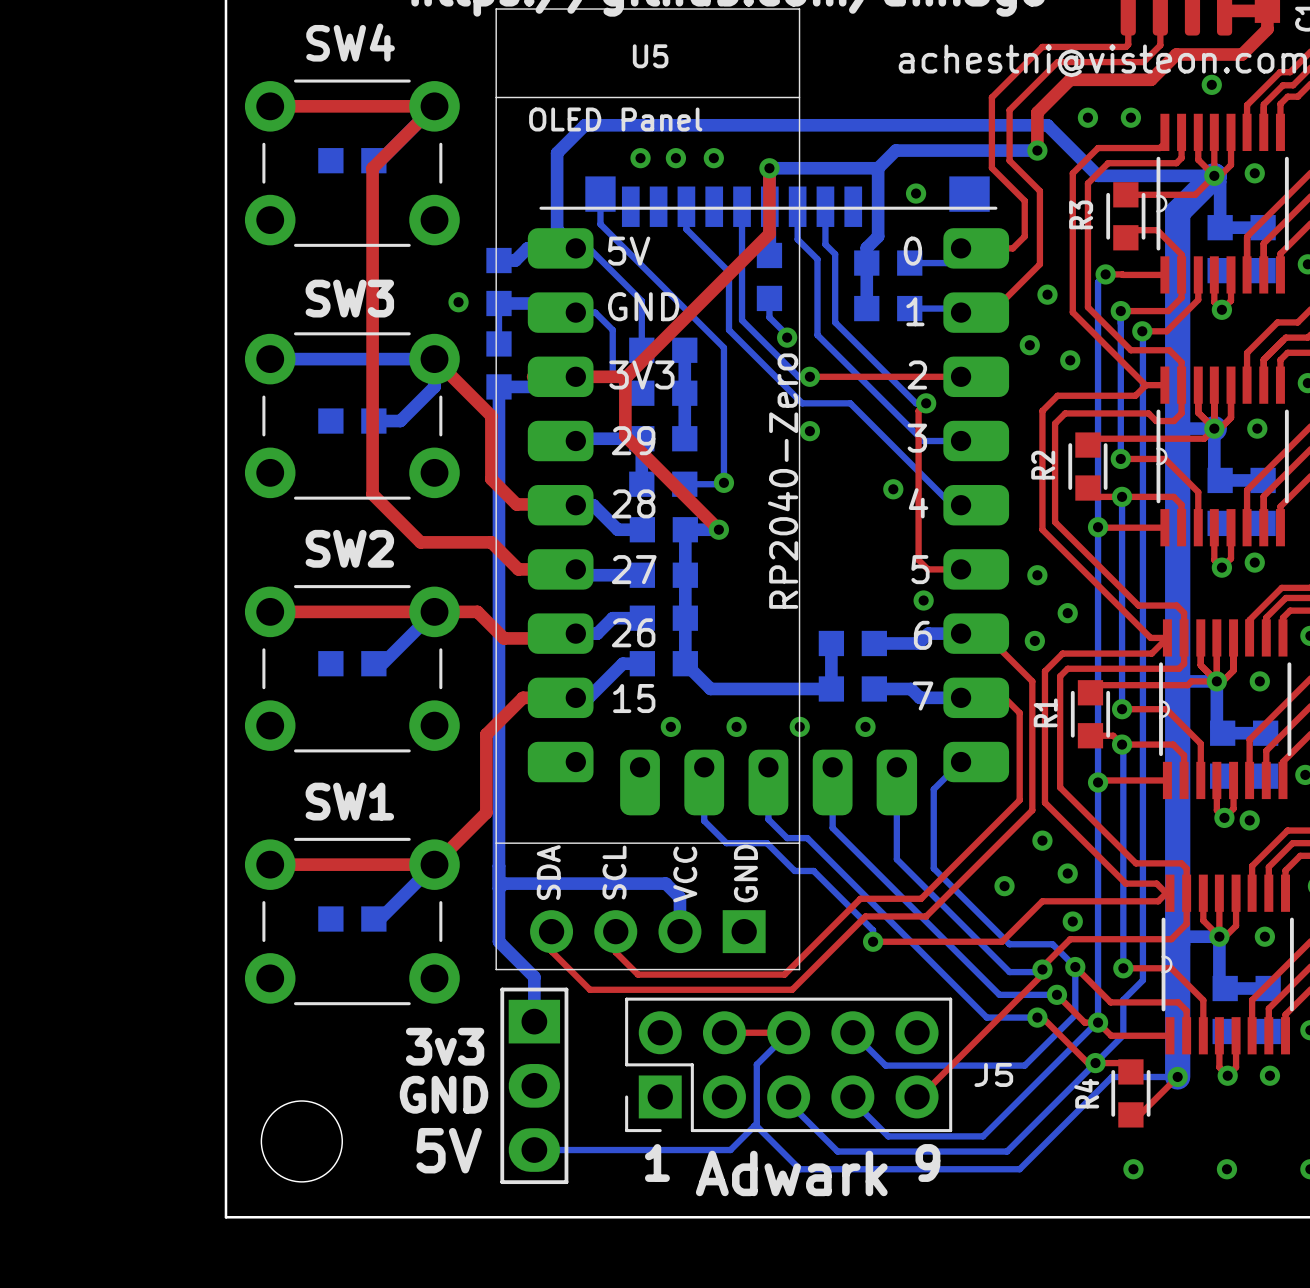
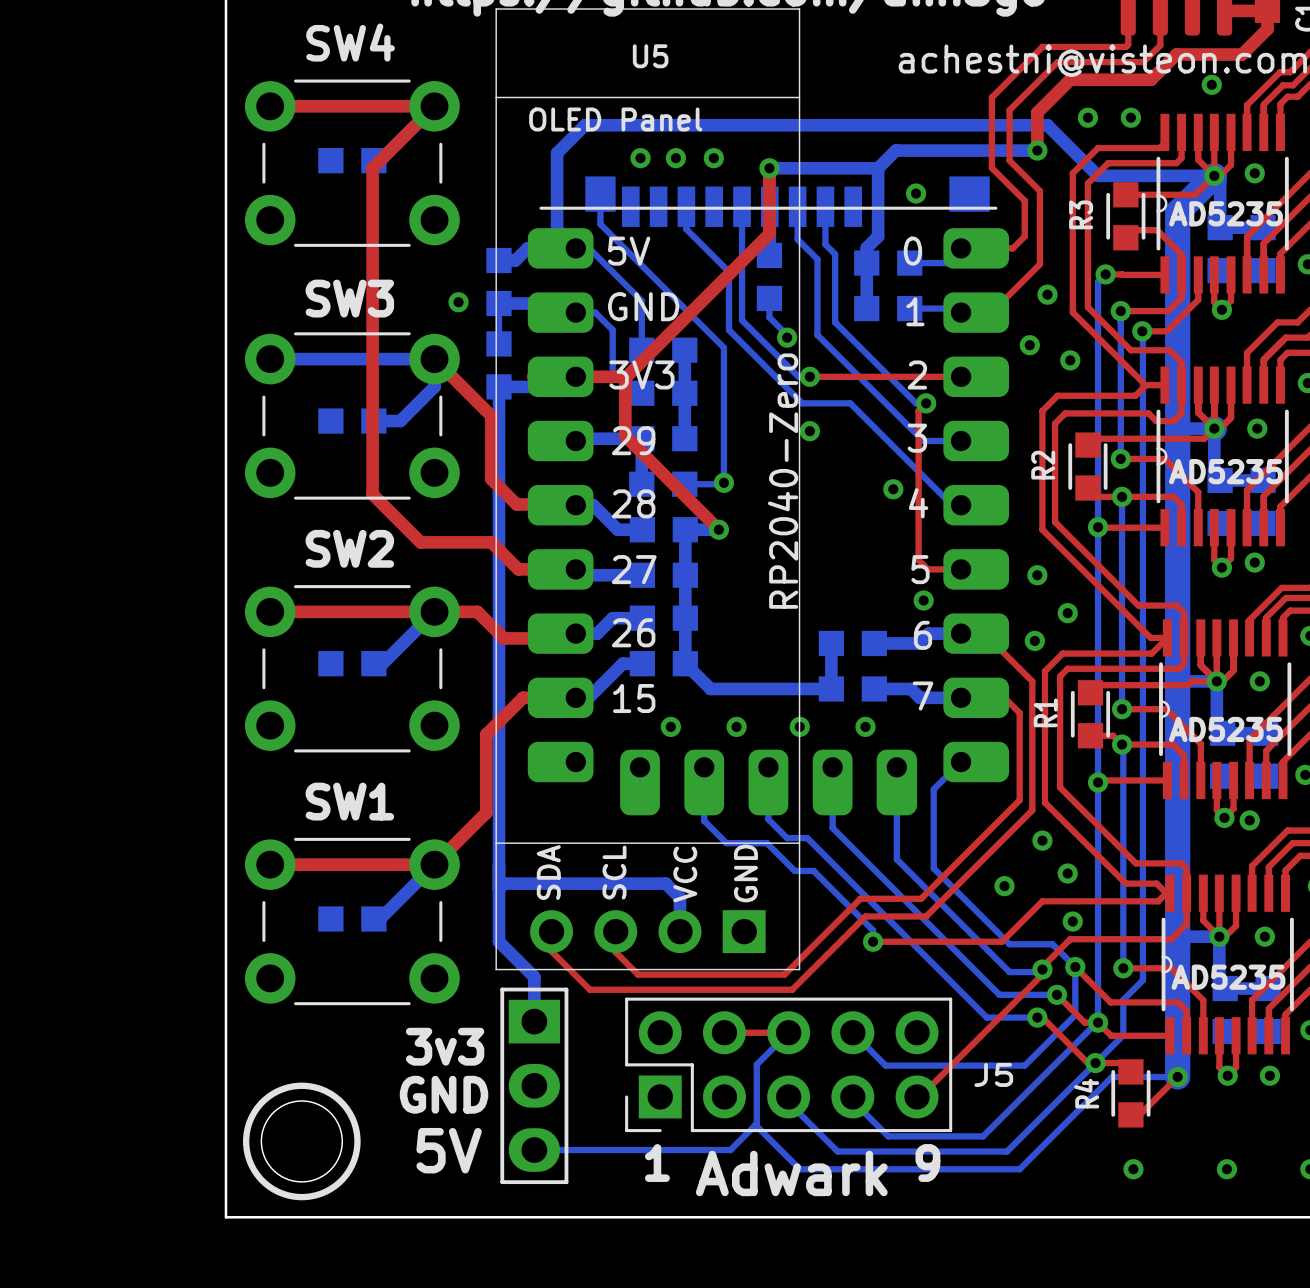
text: none -> AD5235 (1225, 213)
text: none -> AD5235 (1225, 471)
text: none -> AD5235 (1225, 729)
text: none -> AD5235 (1228, 977)
drawing: none -> [242, 1082, 361, 1201]

